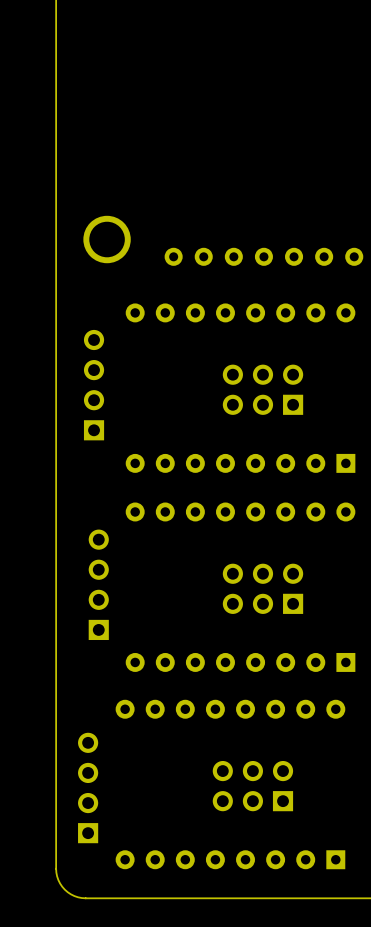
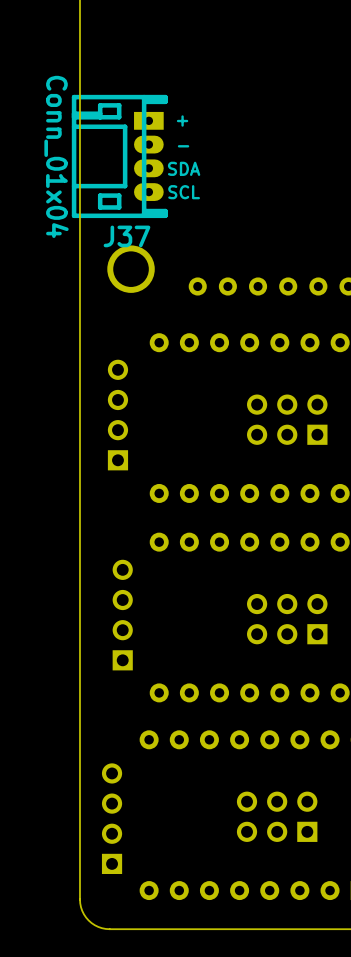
J37: none -> Conn_01x04 (119, 156)

